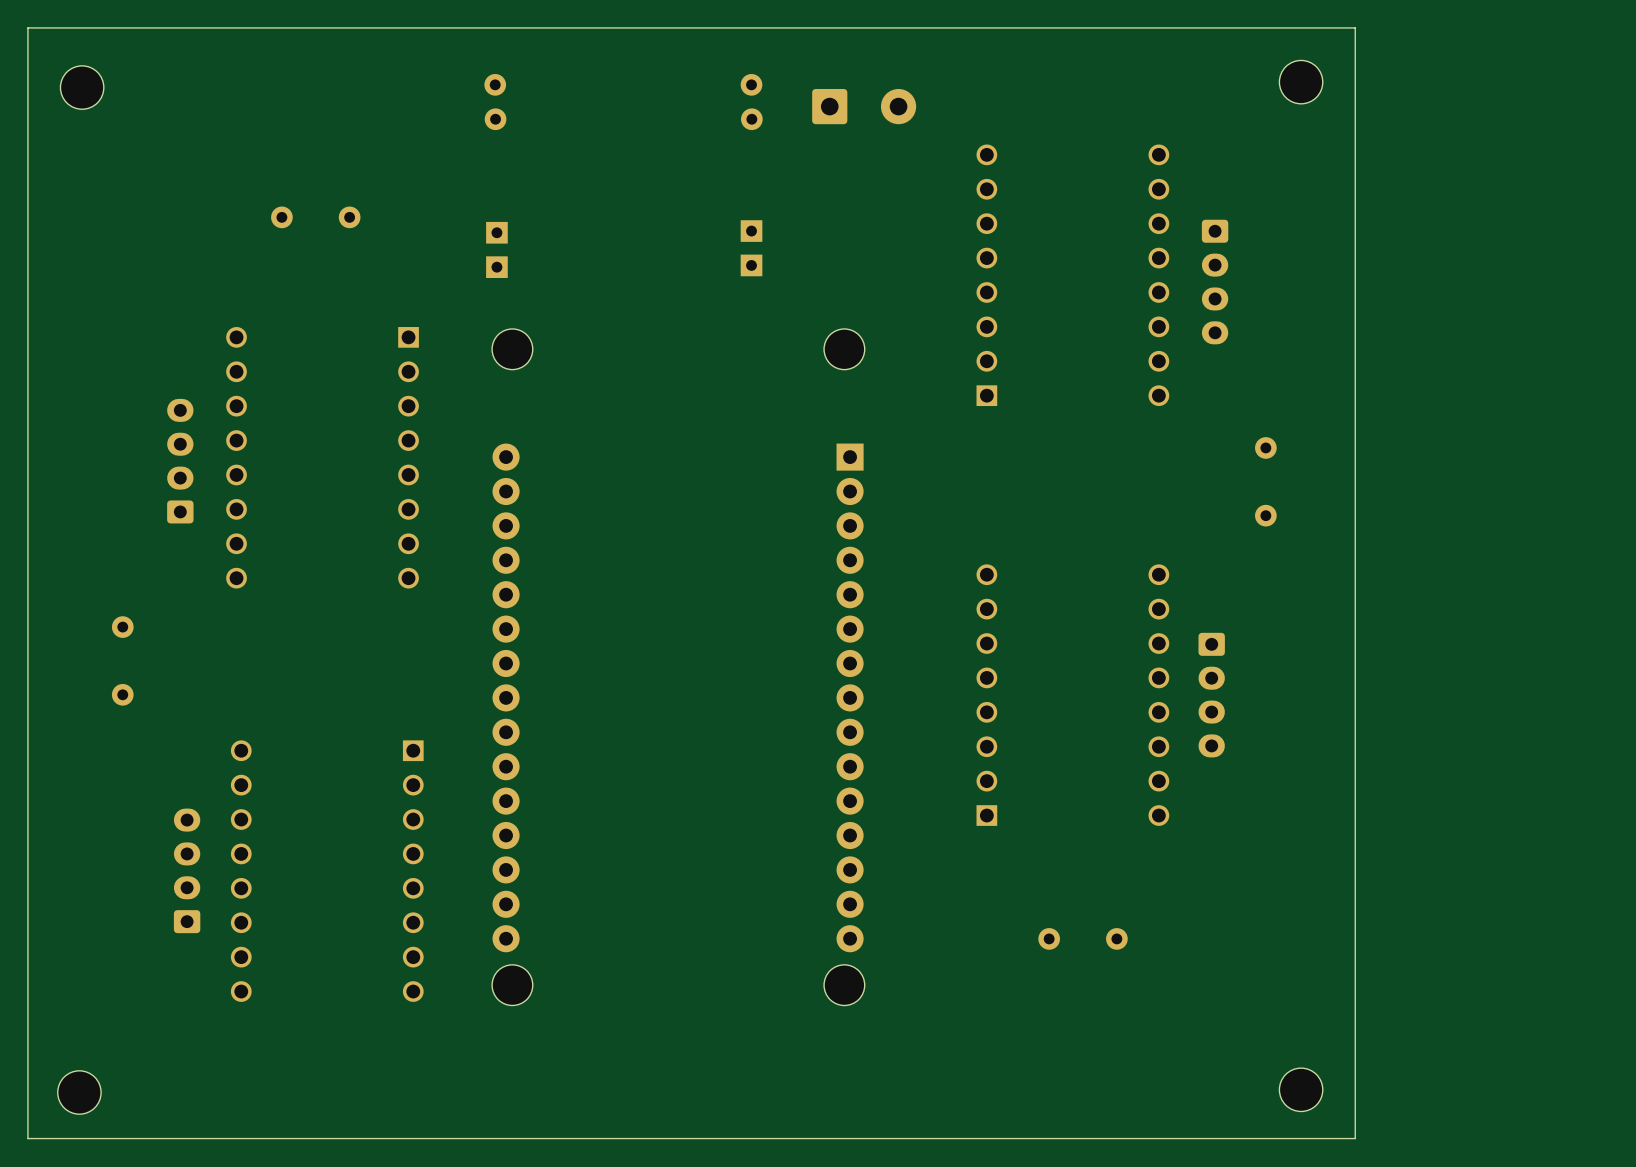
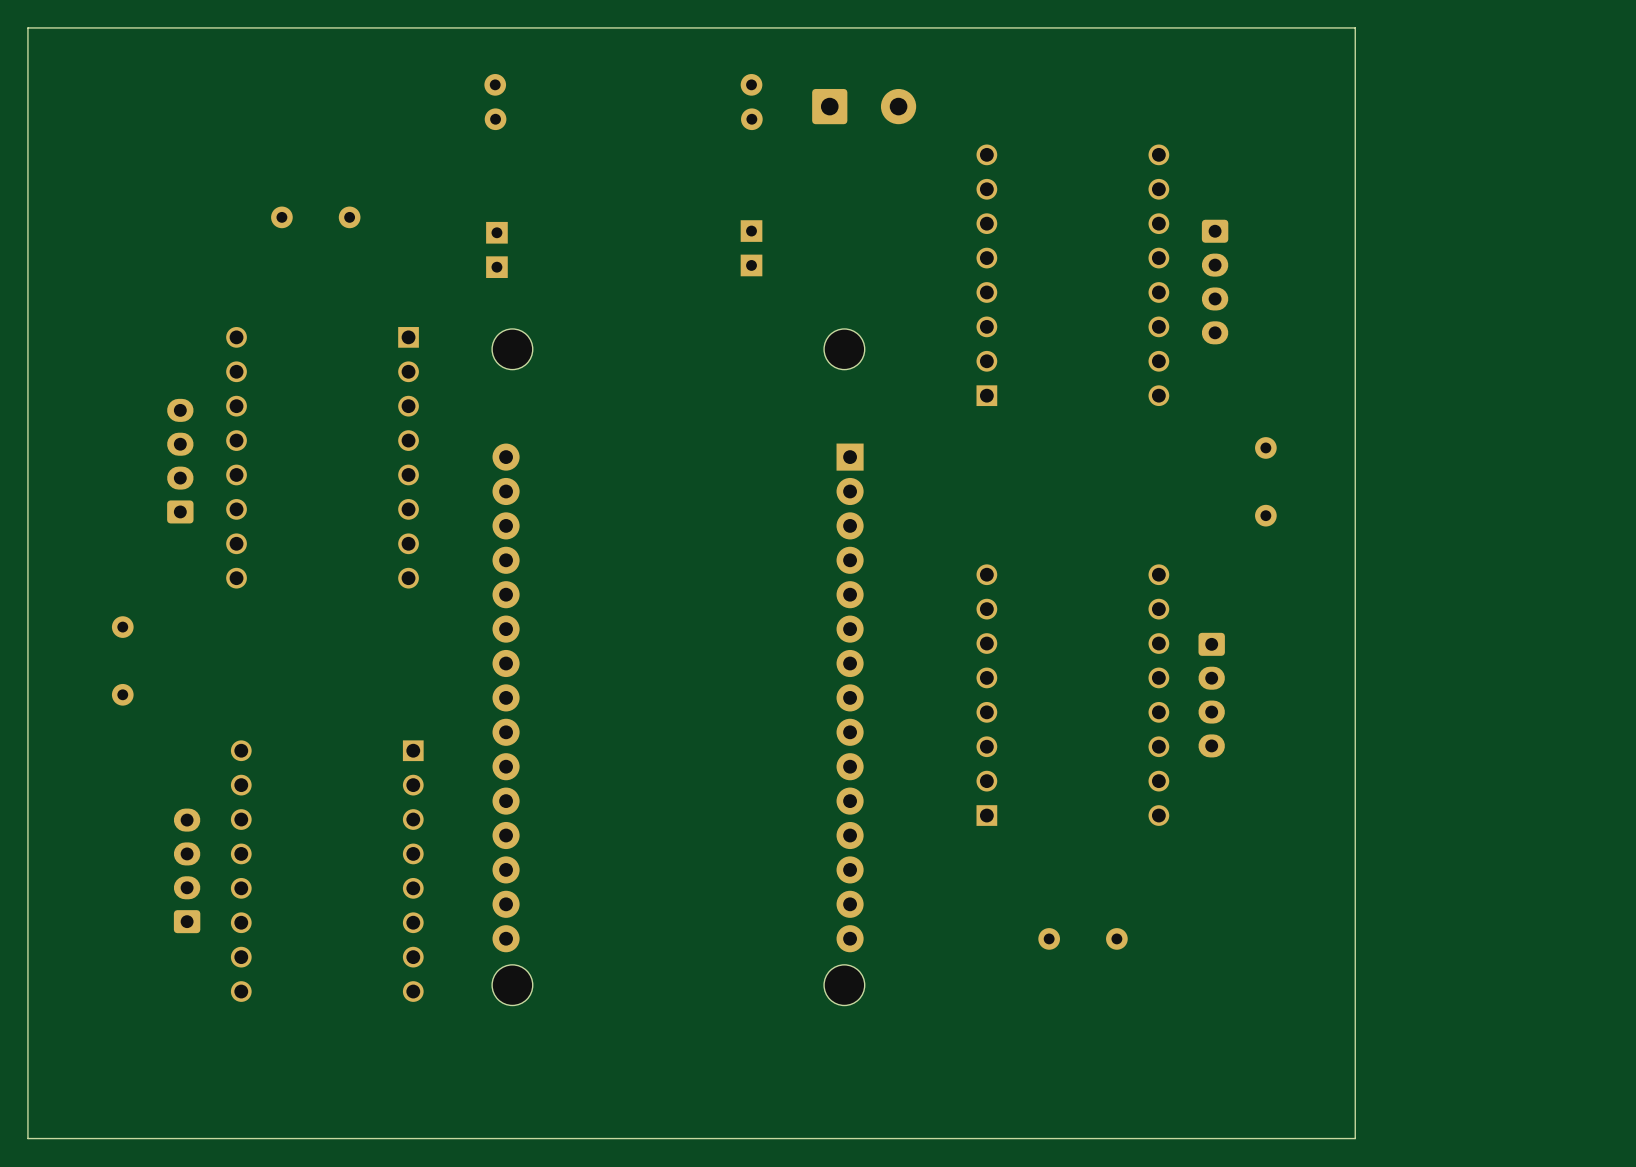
part: (1301, 82) -> none
part: (82, 87) -> none
part: (1301, 1089) -> none
part: (79, 1092) -> none

